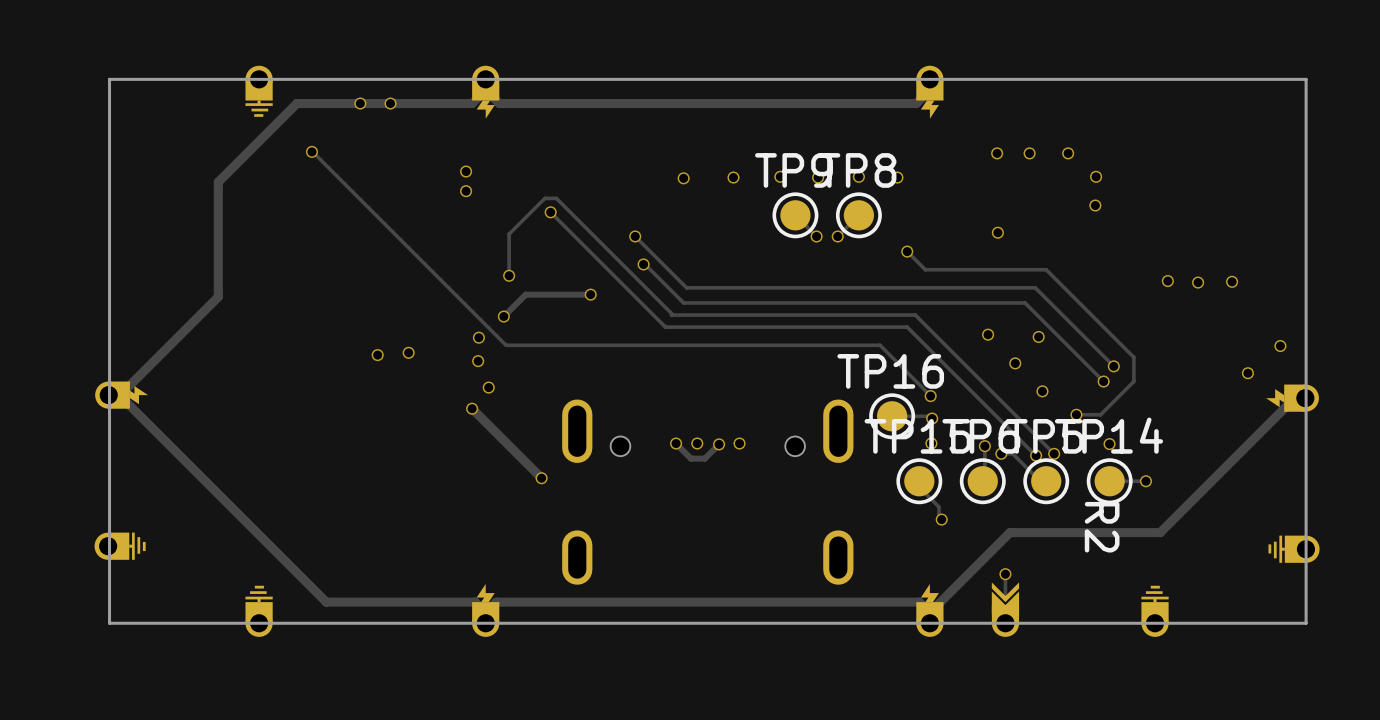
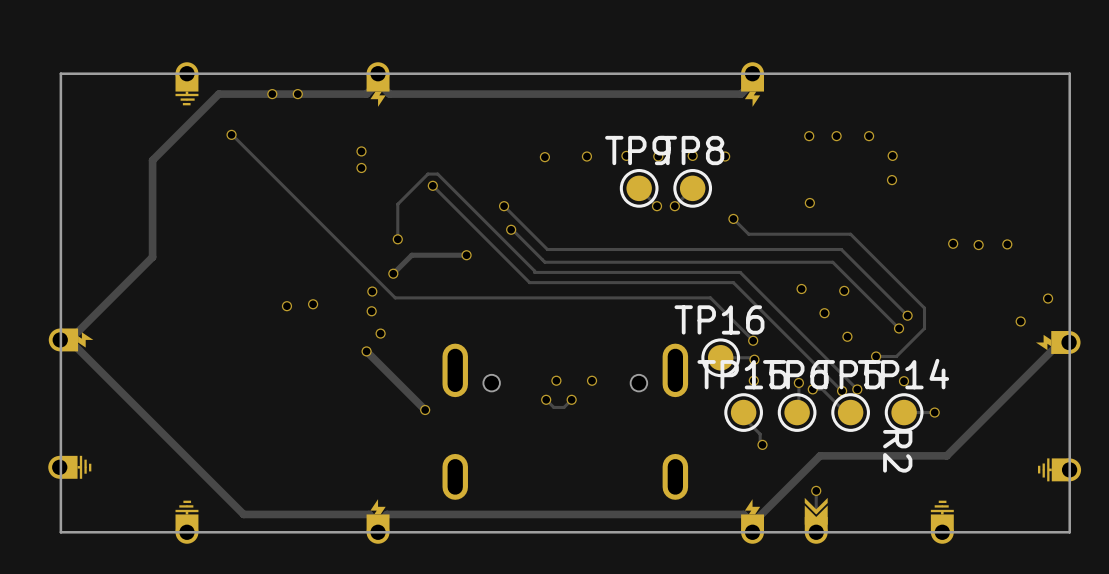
track: (676, 443) (690, 458) (704, 458) (719, 444) -> none
via: (676, 443) -> none
via: (719, 444) -> none
via: none -> (546, 399)
track: none -> (571, 399) (564, 407) (553, 407) (546, 399)
via: none -> (571, 399)

